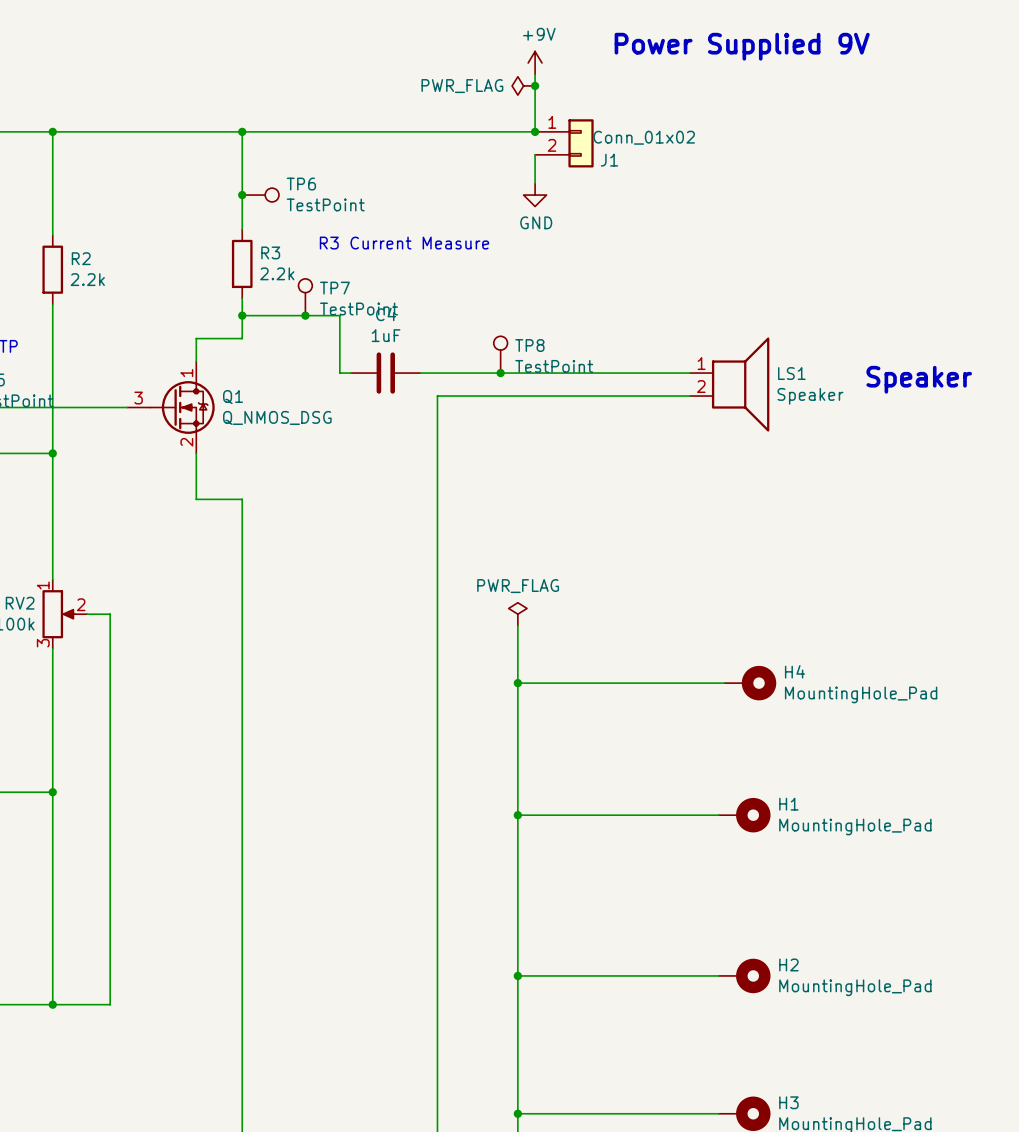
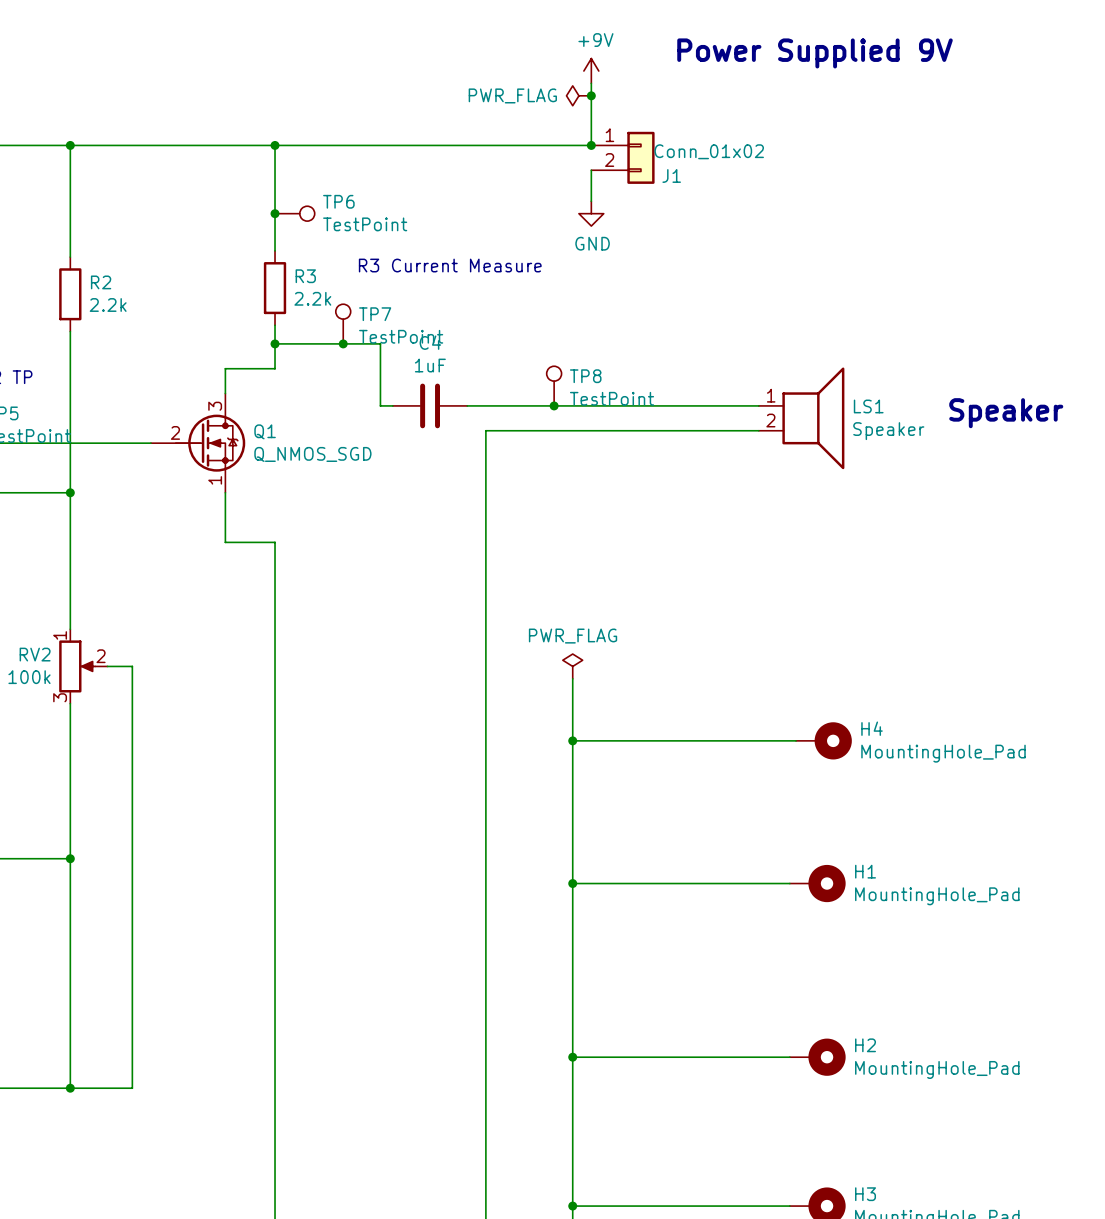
Q1 symbol: [127, 361, 215, 454] -> [150, 393, 246, 493]
Q1 value: Q_NMOS_DSG (277, 417) -> Q_NMOS_SGD (312, 454)

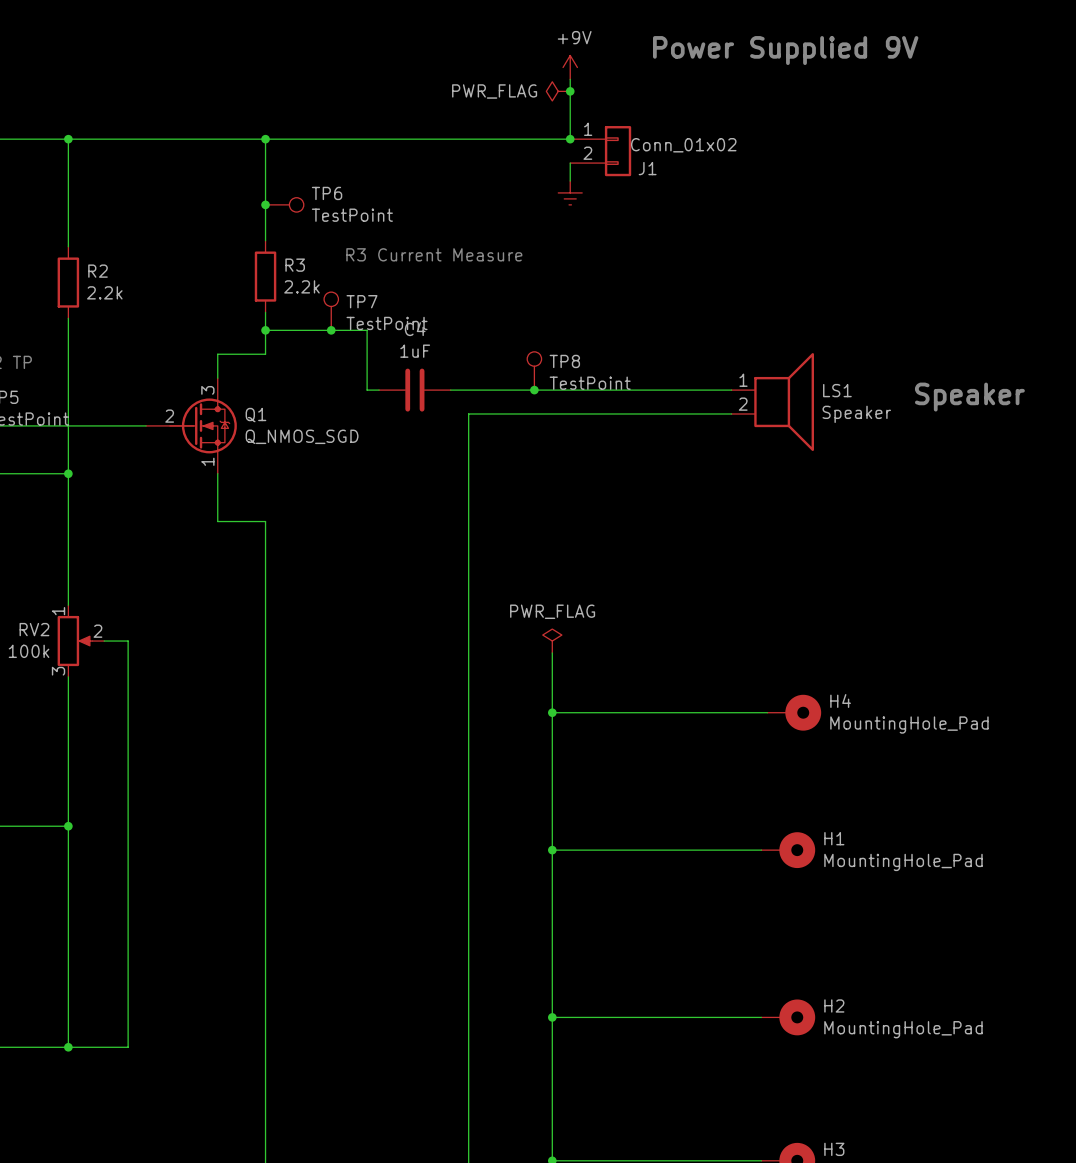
power symbol: none -> (570, 192)
power symbol: GND (591, 213) -> none

